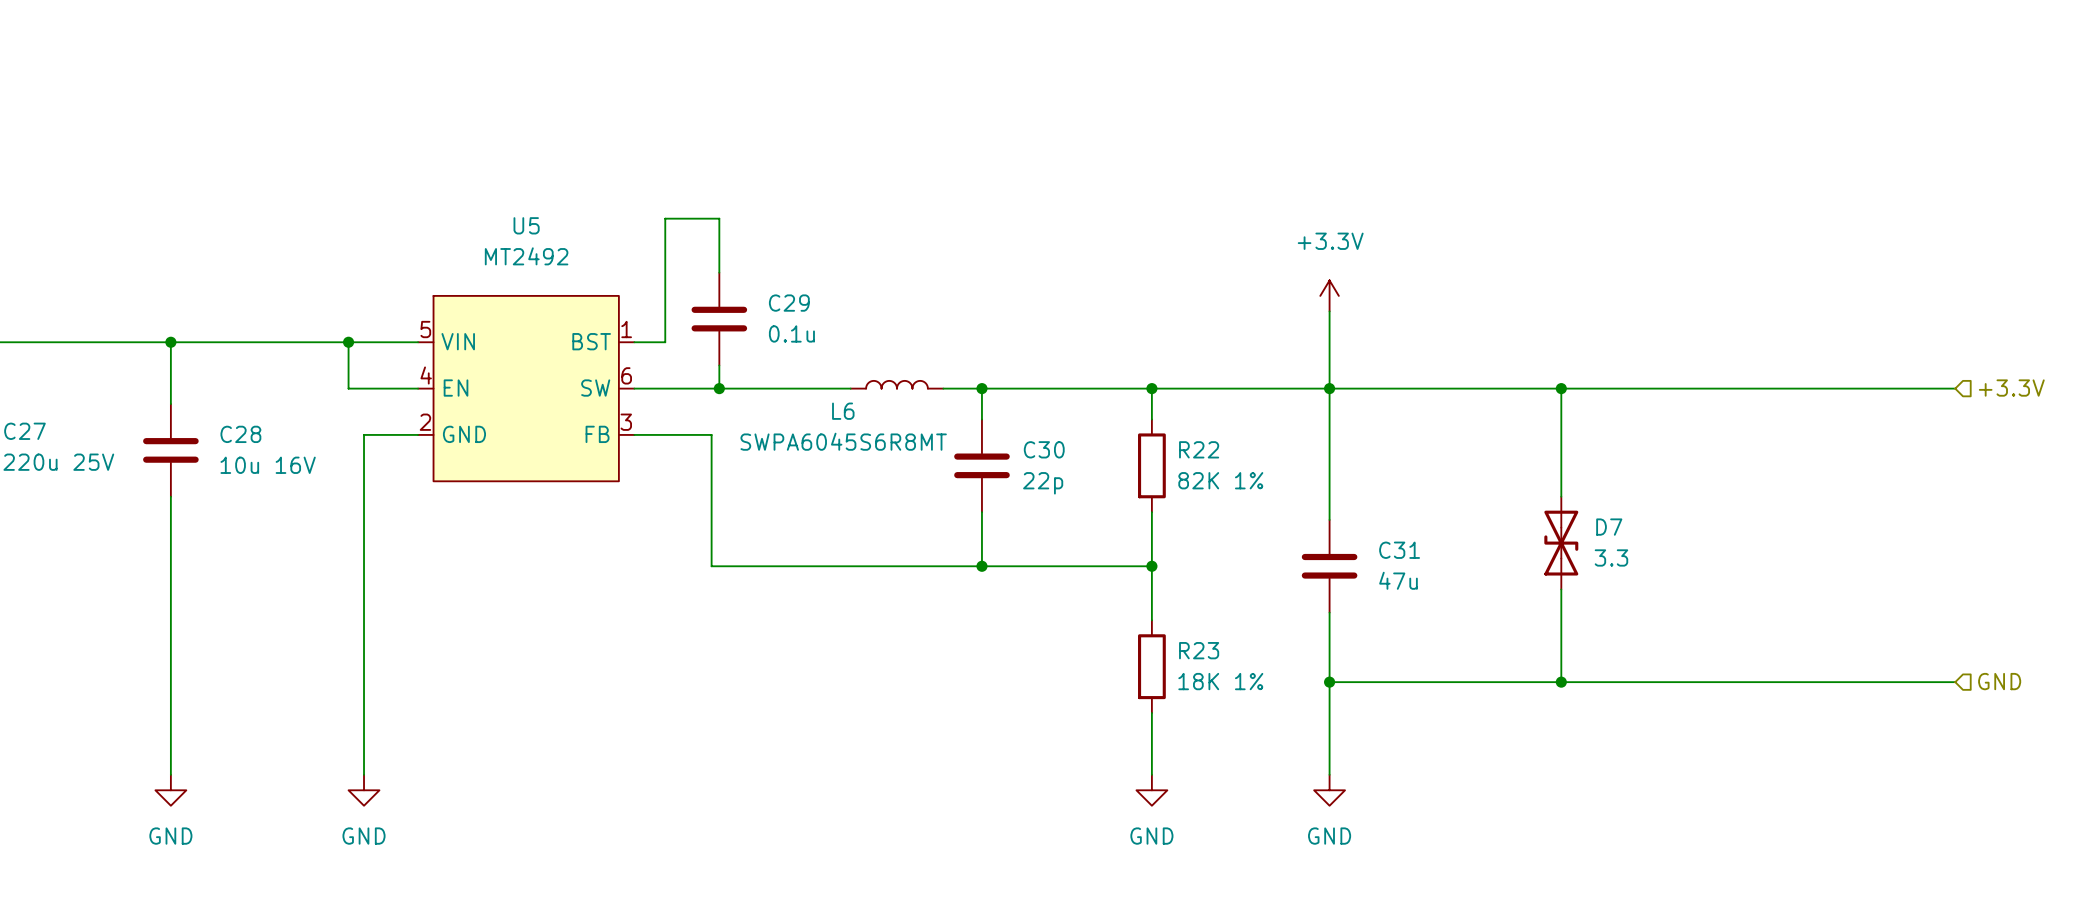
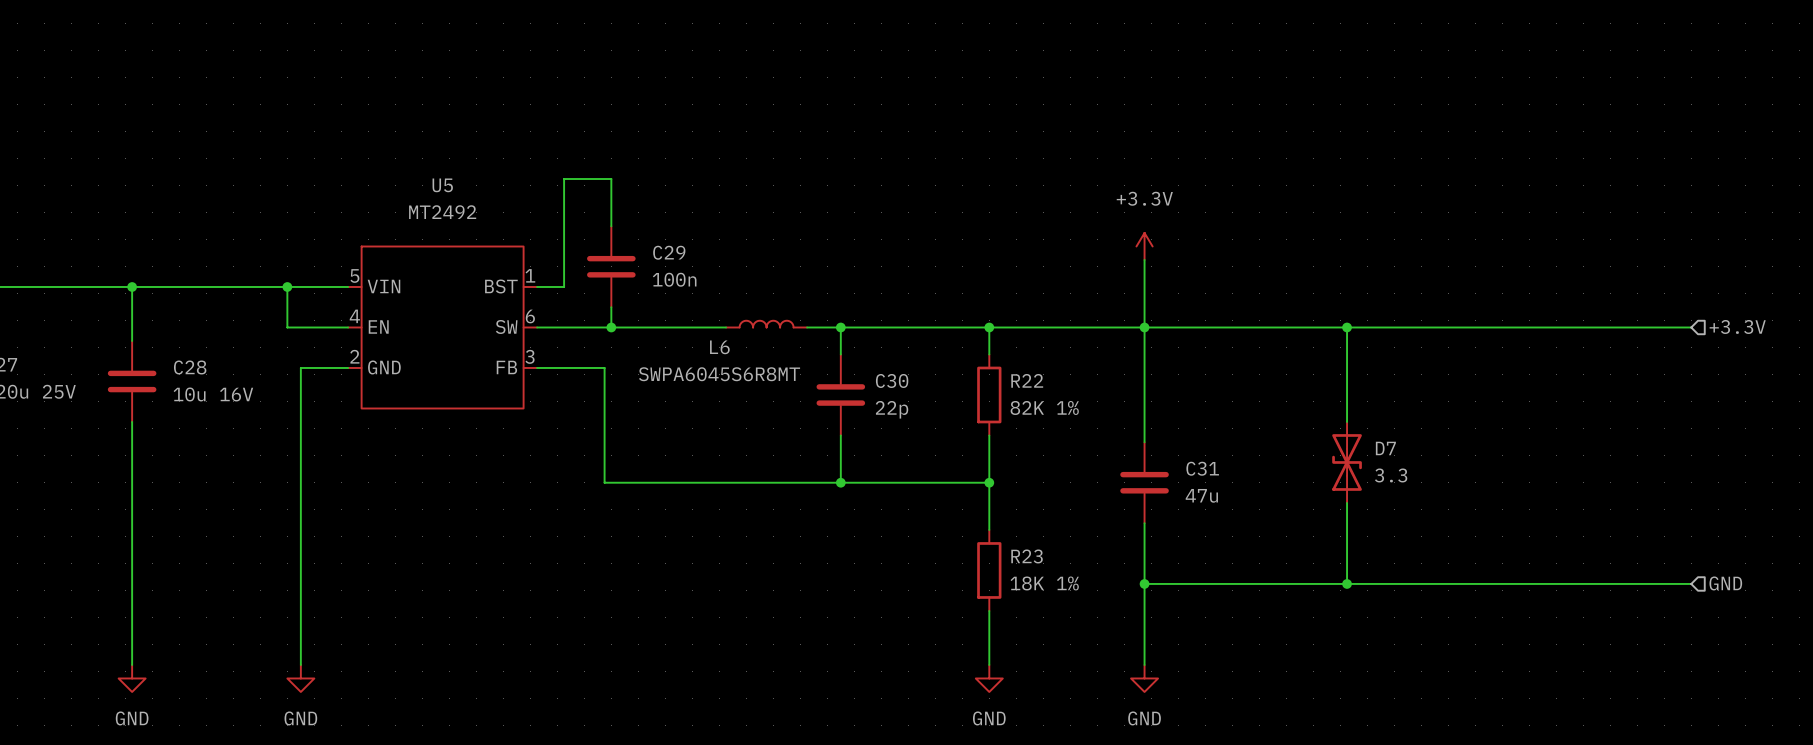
C29 value: 0.1u (791, 333) -> 100n (674, 279)

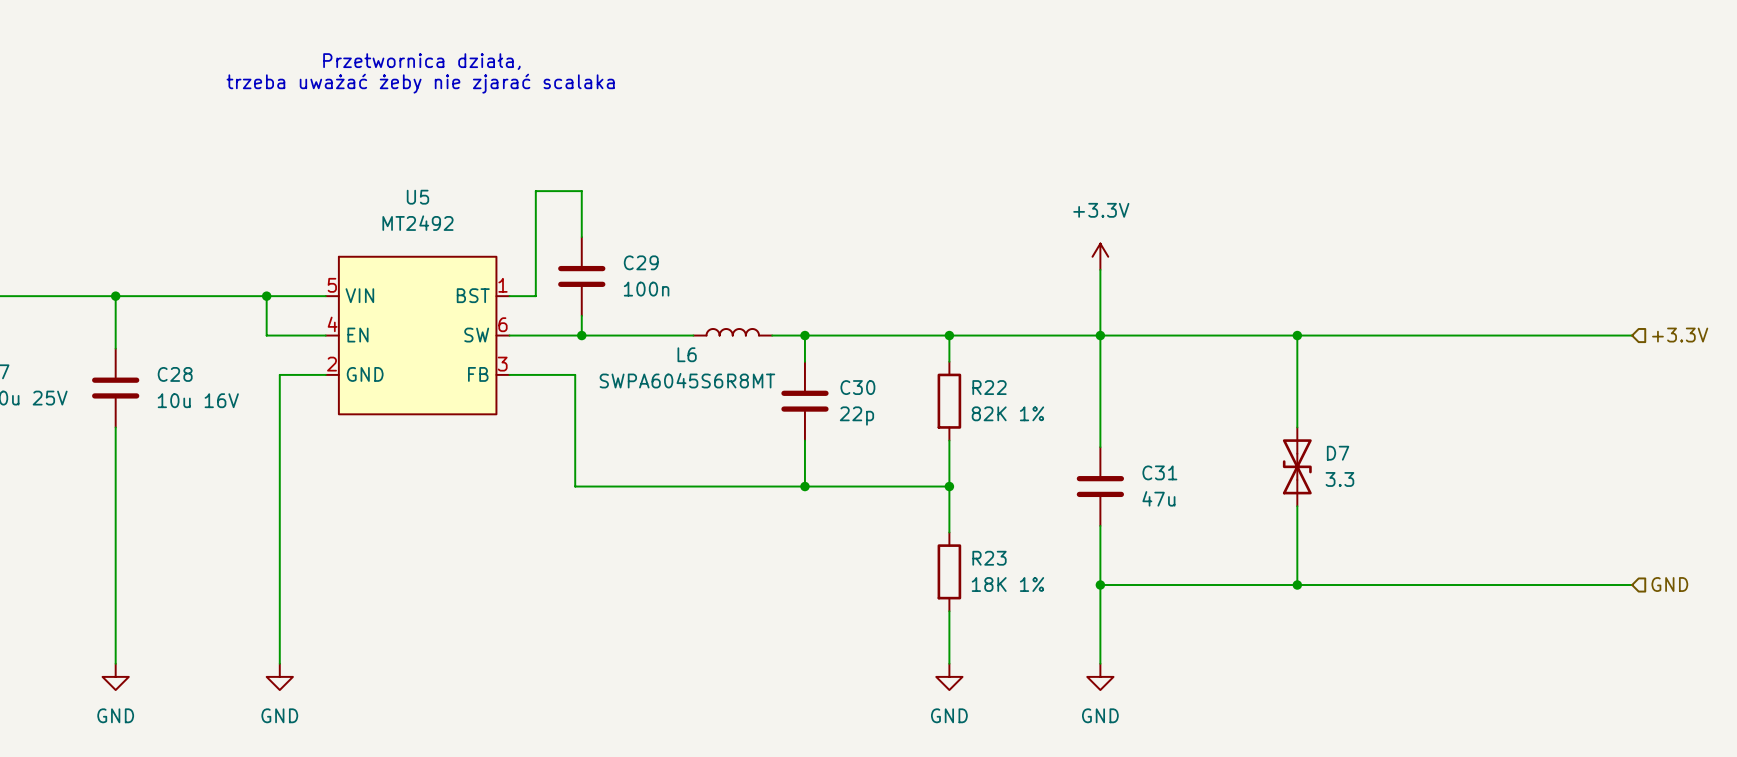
text: none -> Przetwornica działa, (421, 61)
text: none -> trzeba uważać żeby nie zjarać scalaka (420, 83)

